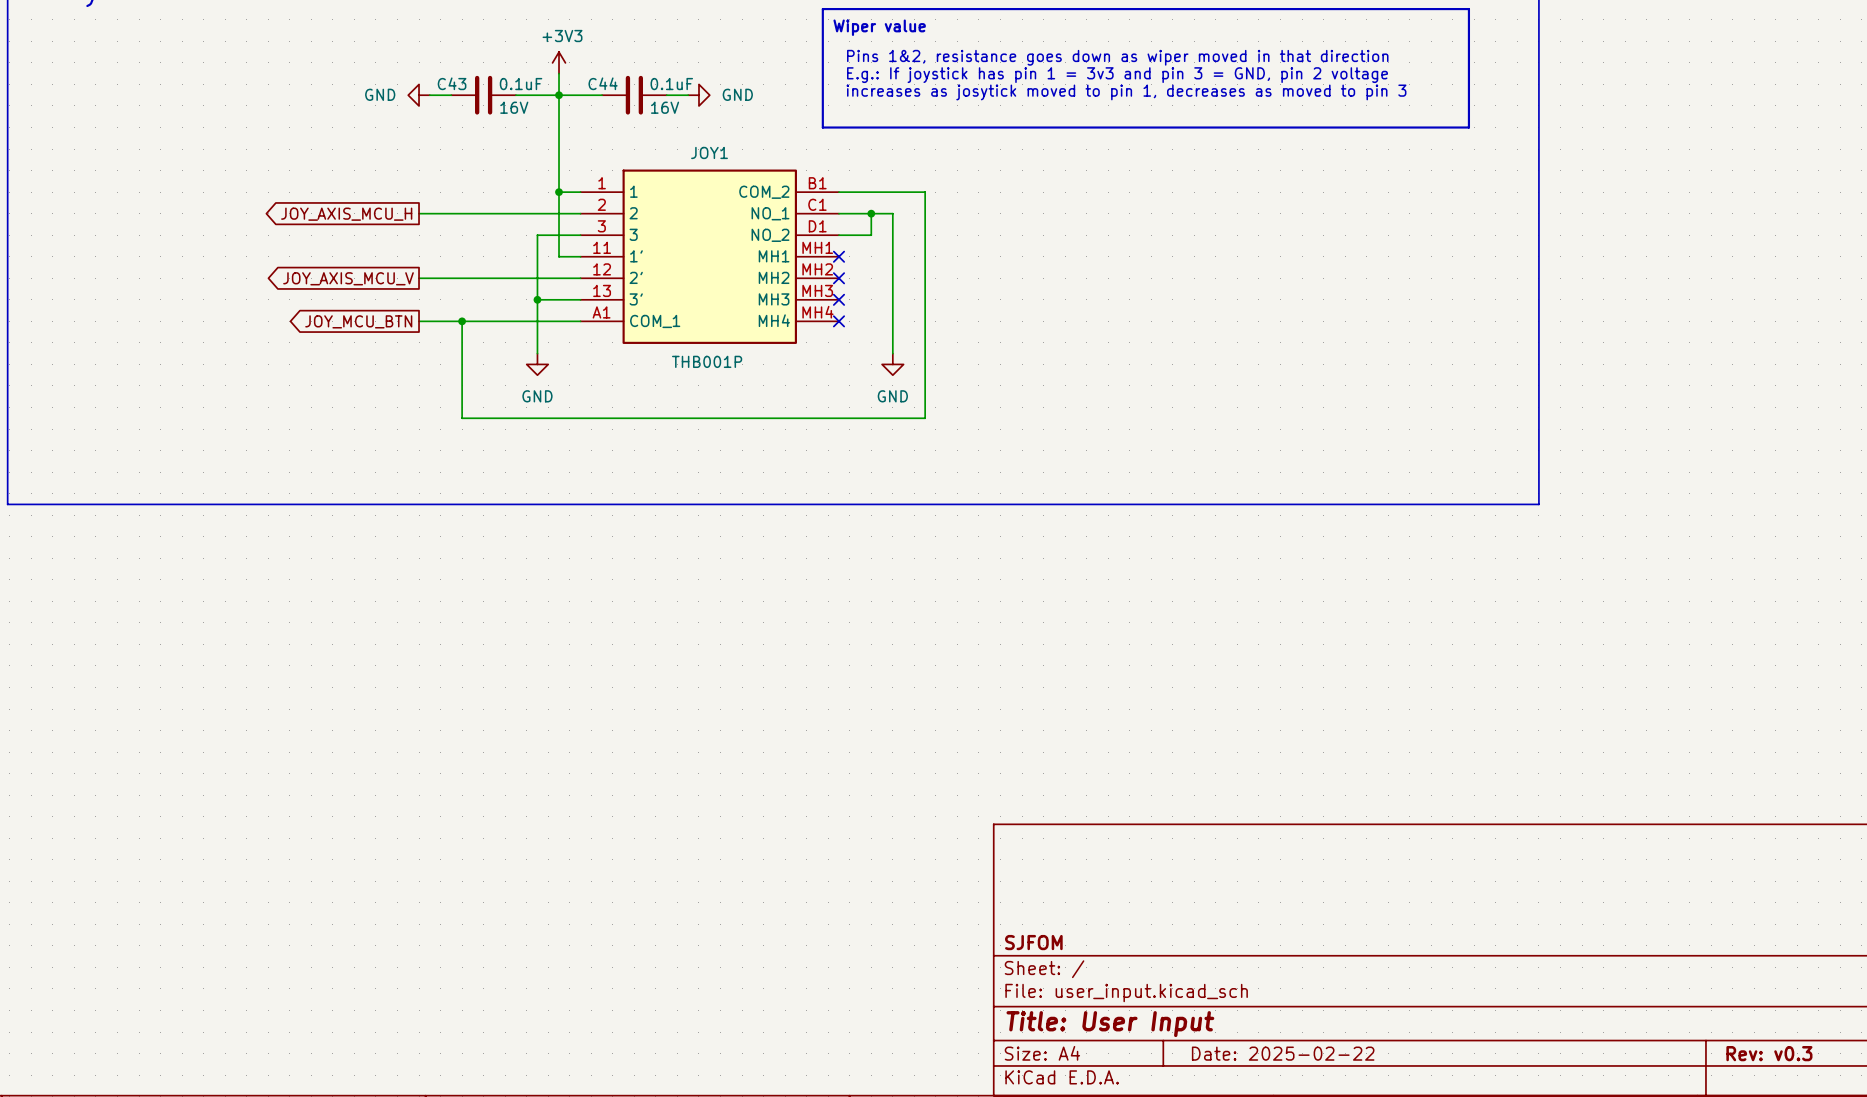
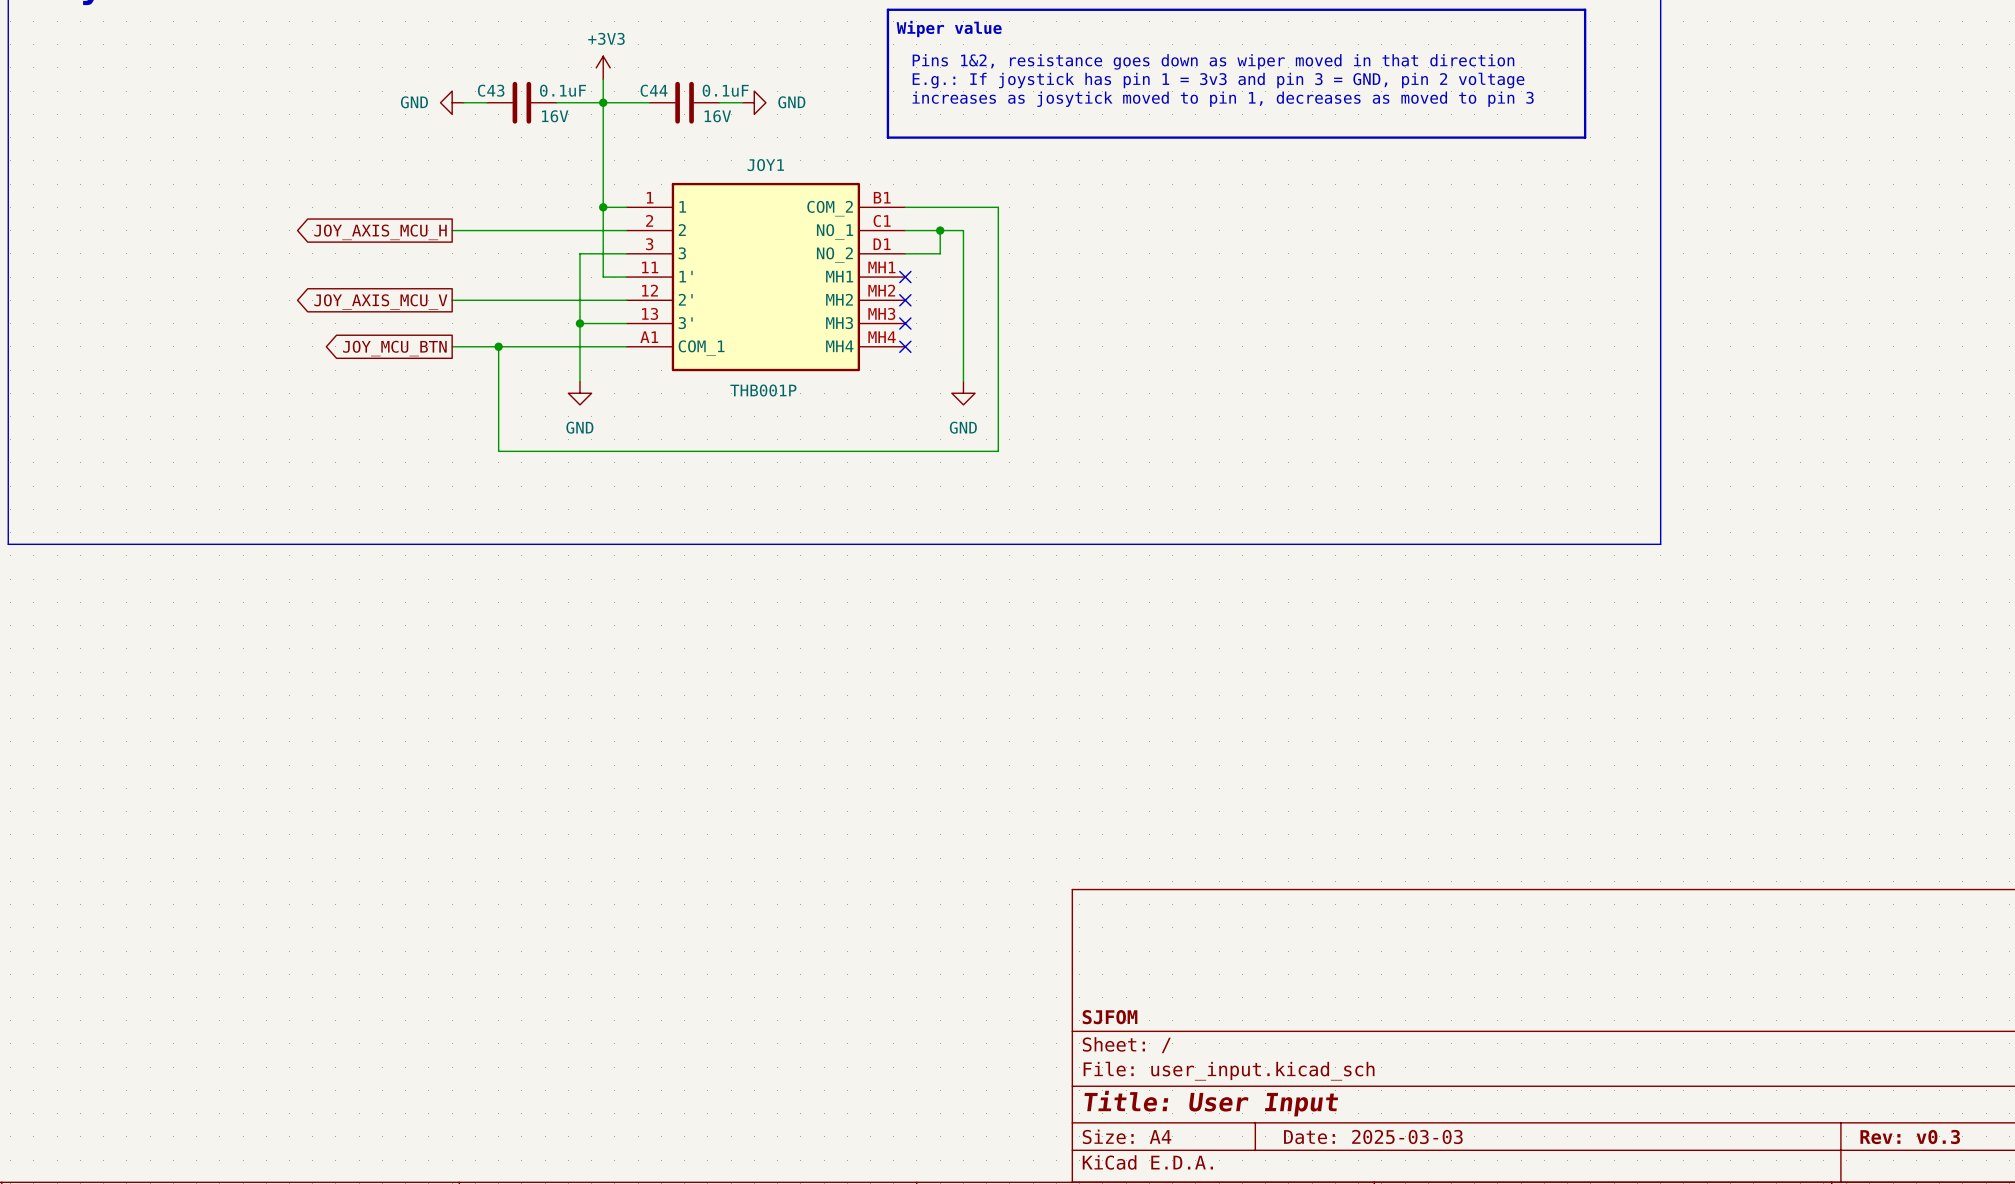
title block: Date: 2025-02-22 (1283, 1053) -> Date: 2025-03-03 (1373, 1136)

